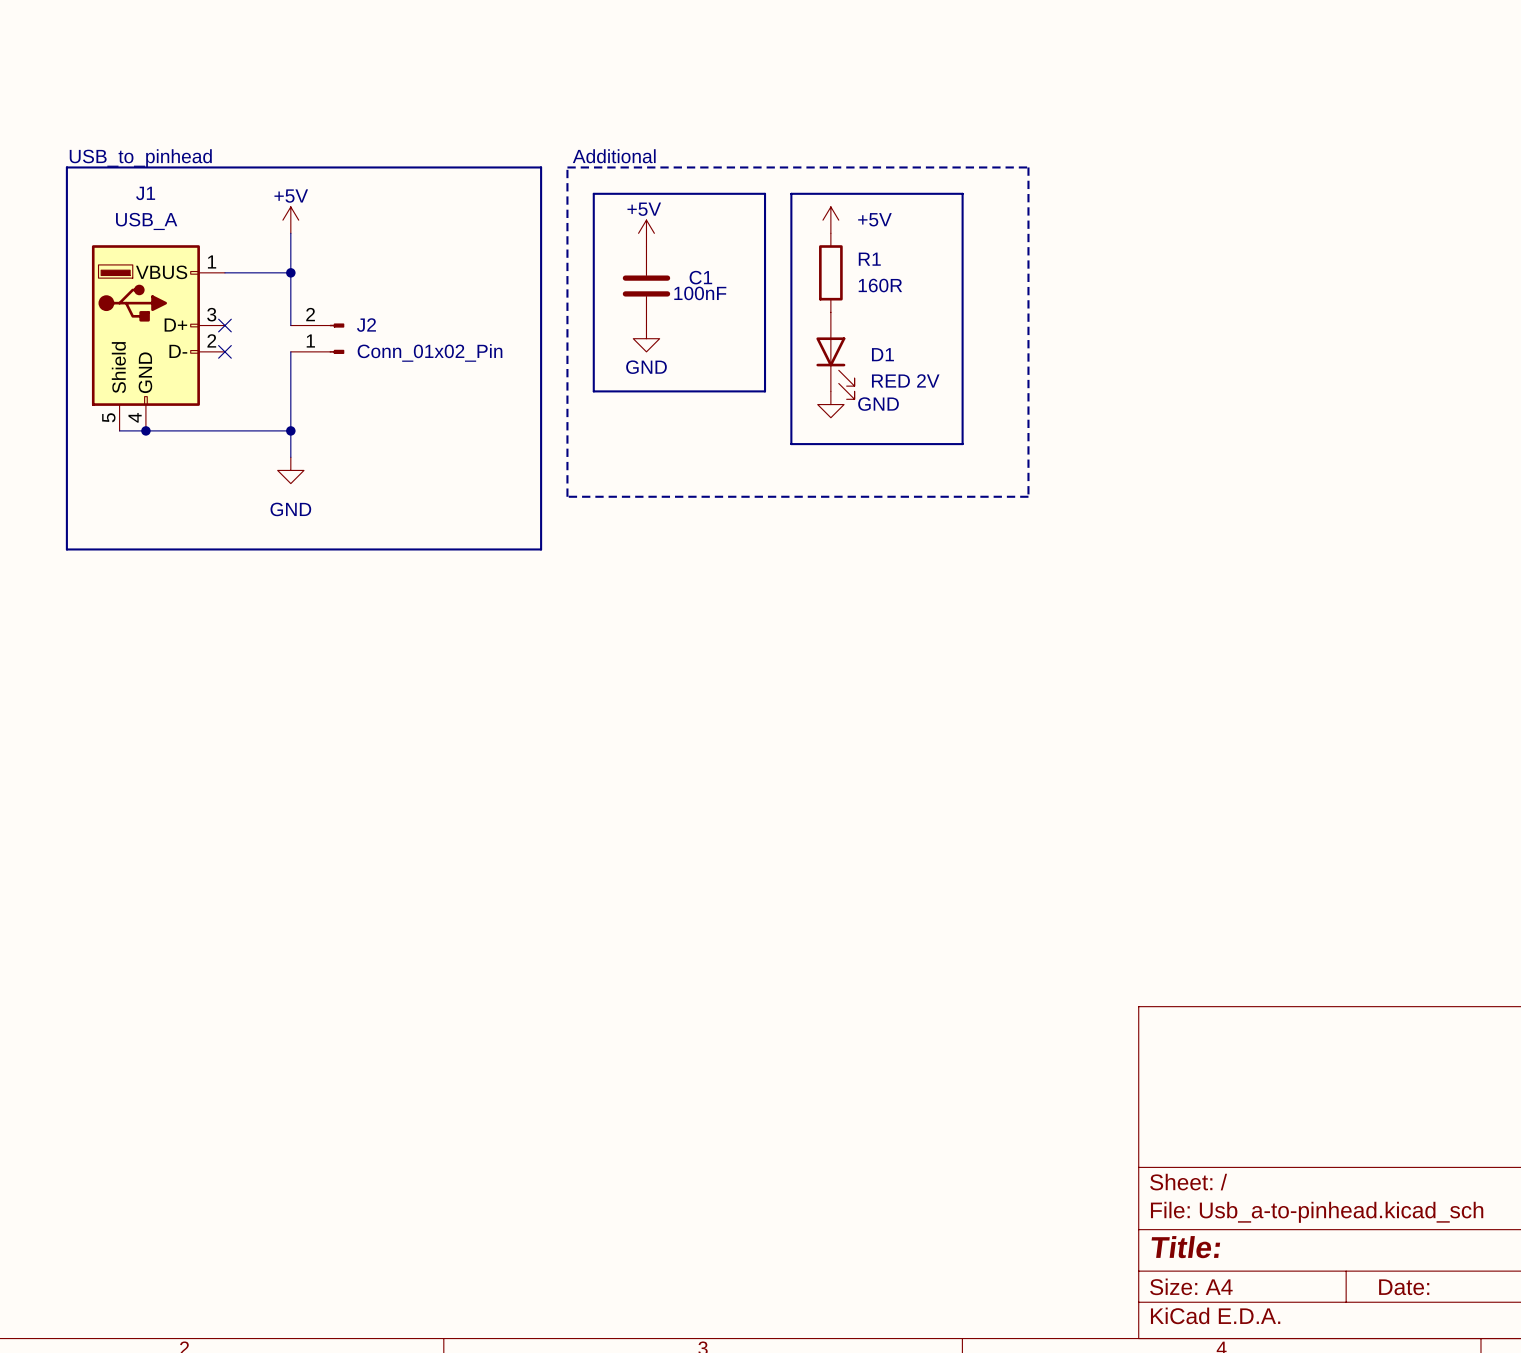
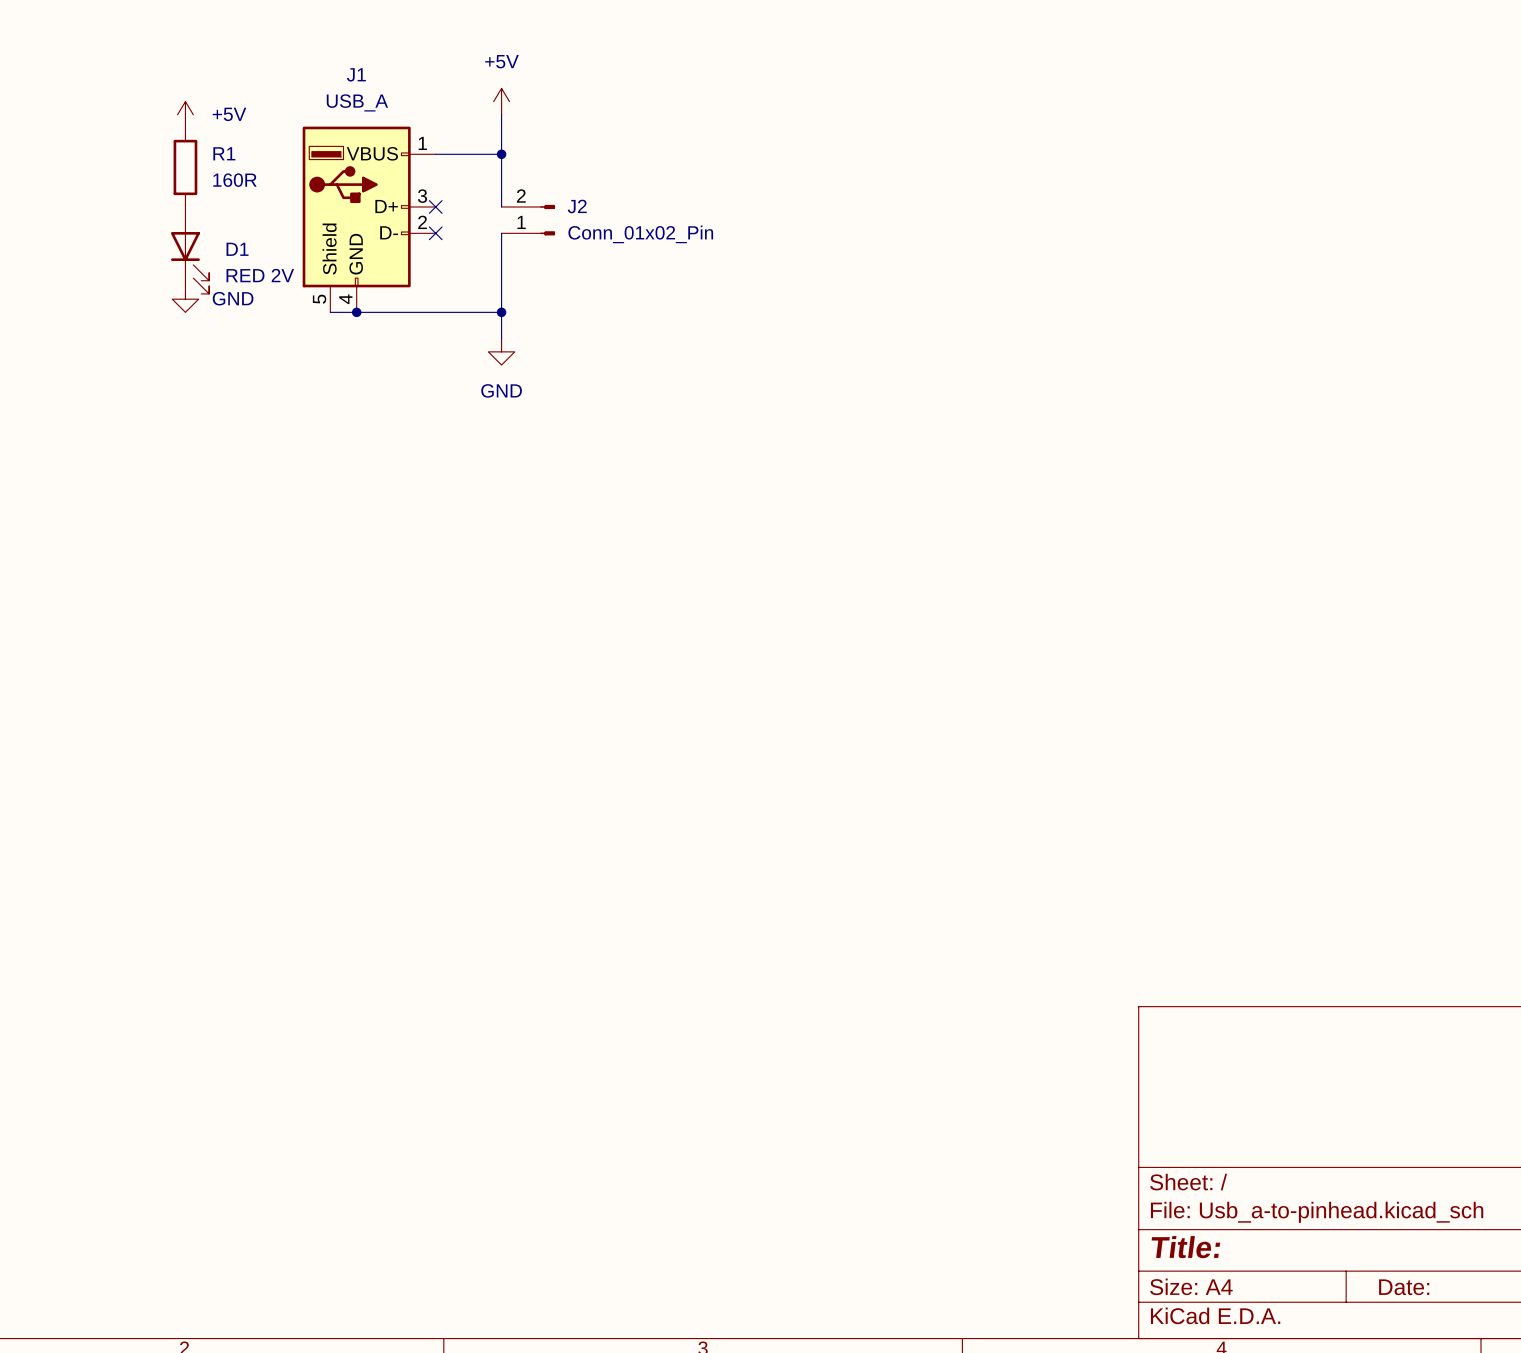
power symbol: none -> +5V (501, 101)
power symbol: none -> +5V (185, 114)
junction: none -> (501, 154)
text: Additional (614, 156) -> none
text: USB_to_pinhead (140, 158) -> none
line: (66, 167) (541, 167) (541, 549) (66, 549) (66, 167) -> none
line: (567, 167) (1028, 167) (1028, 496) (567, 496) (567, 167) -> none
line: (593, 193) (765, 193) (765, 391) (593, 391) (593, 193) -> none
line: (791, 193) (962, 193) (962, 444) (791, 444) (791, 193) -> none
no-connect mark: none -> (435, 206)
power symbol: +5V (290, 220) -> none
power symbol: +5V (830, 220) -> none
wire: (290, 233) (290, 325) -> (501, 114) (501, 206)
no-connect mark: none -> (435, 233)
power symbol: +5V (646, 233) -> none
wire: (224, 272) (290, 272) -> (435, 154) (501, 154)
junction: (290, 272) -> none
R1 position: (830, 272) -> (185, 167)
C1: 100nF (646, 286) -> none
power symbol: none -> GND (185, 299)
junction: none -> (356, 312)
junction: none -> (501, 312)
no-connect mark: (224, 325) -> none
J1 position: (158, 338) -> (369, 219)
J2 position: (317, 338) -> (528, 220)
power symbol: GND (646, 338) -> none
no-connect mark: (224, 351) -> none
wire: (290, 351) (290, 457) -> (501, 233) (501, 338)
power symbol: none -> GND (501, 351)
D1 position: (835, 355) -> (190, 250)
power symbol: GND (830, 404) -> none
wire: (119, 430) (290, 430) -> (330, 312) (501, 312)
junction: (145, 430) -> none
junction: (290, 430) -> none
power symbol: GND (290, 470) -> none

